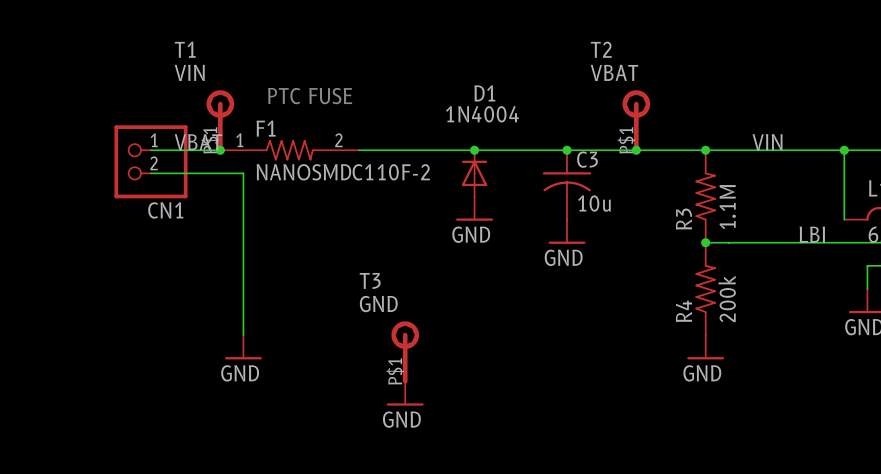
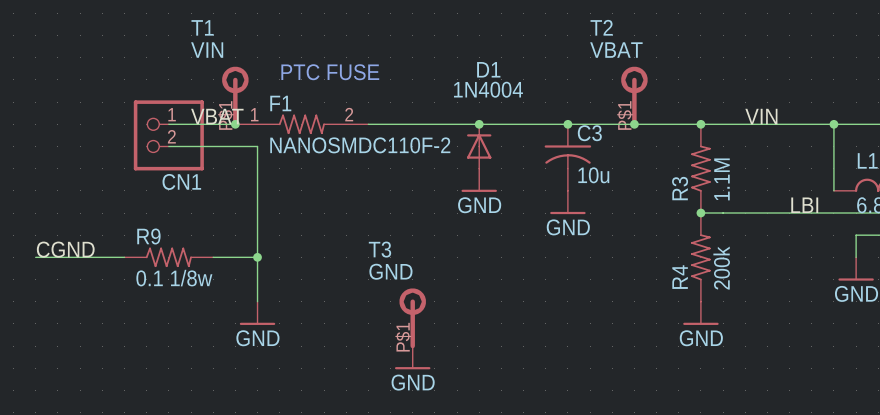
label: none -> CGND (65, 249)
wire: none -> (35, 257) (124, 257)
R9: none -> 0.1 1/8w (168, 257)
wire: none -> (213, 257) (257, 257)
junction: none -> (257, 257)

